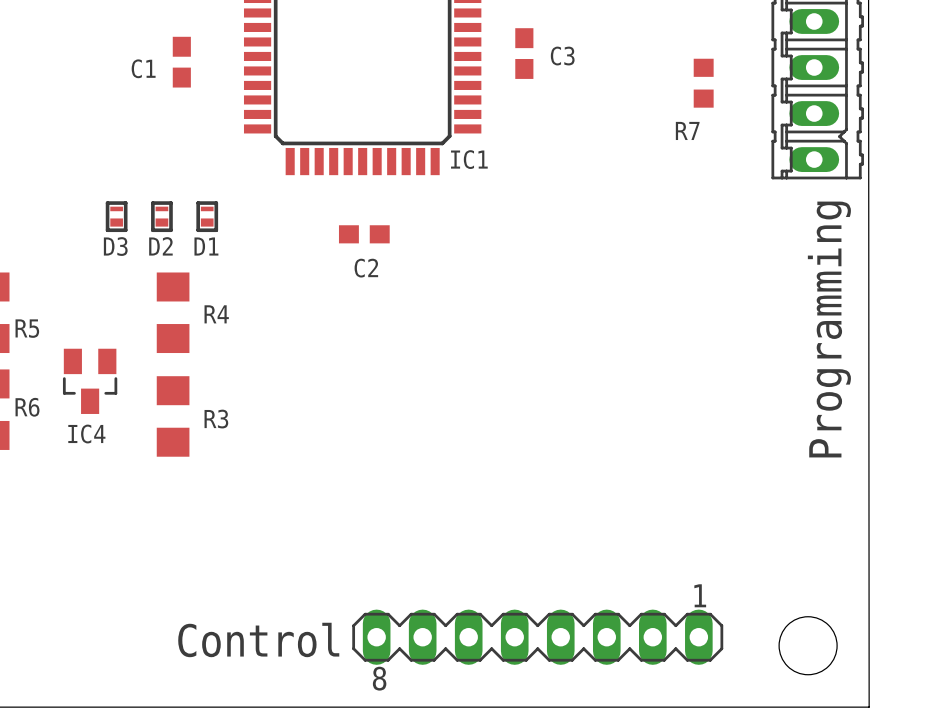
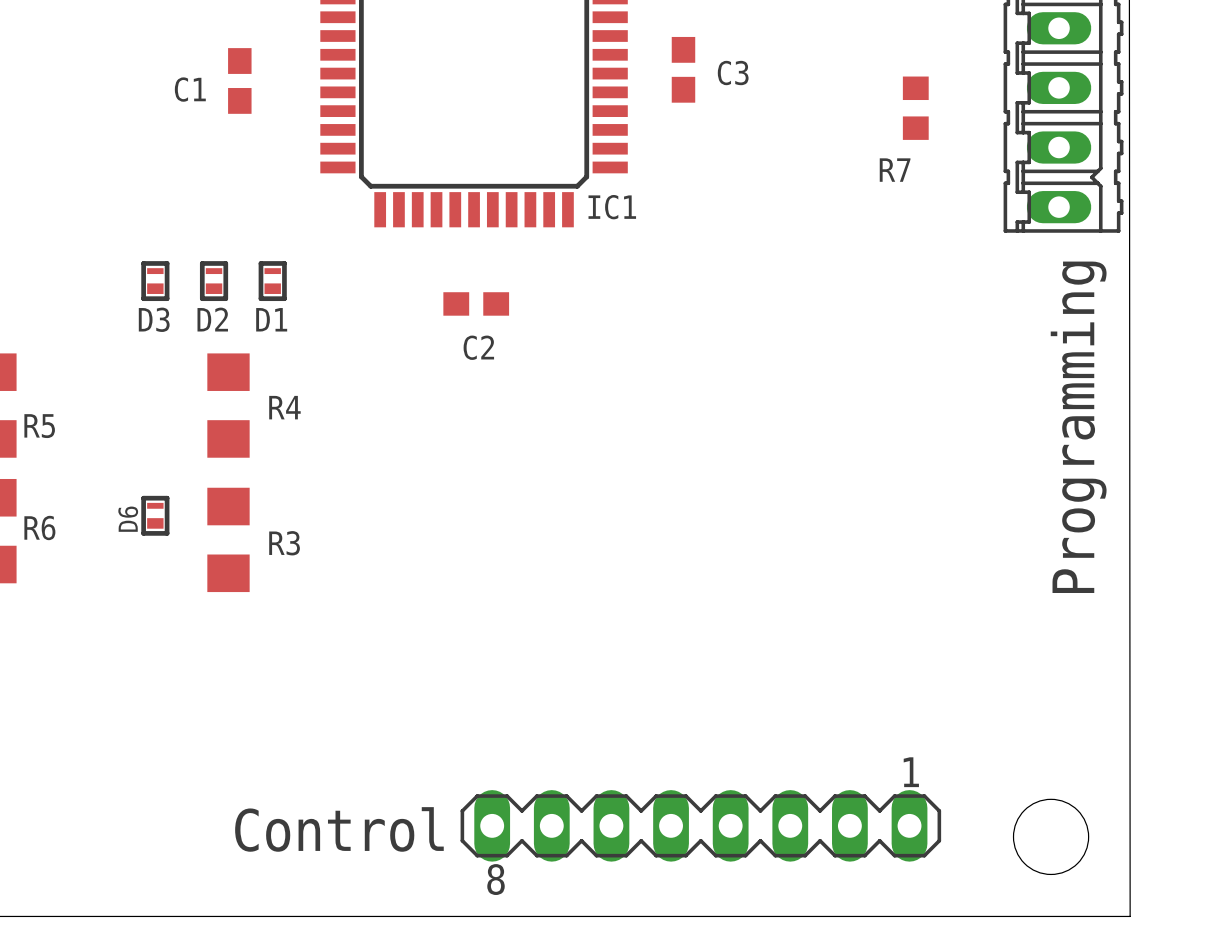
IC4: (90, 381) -> none
D6: none -> (155, 515)

